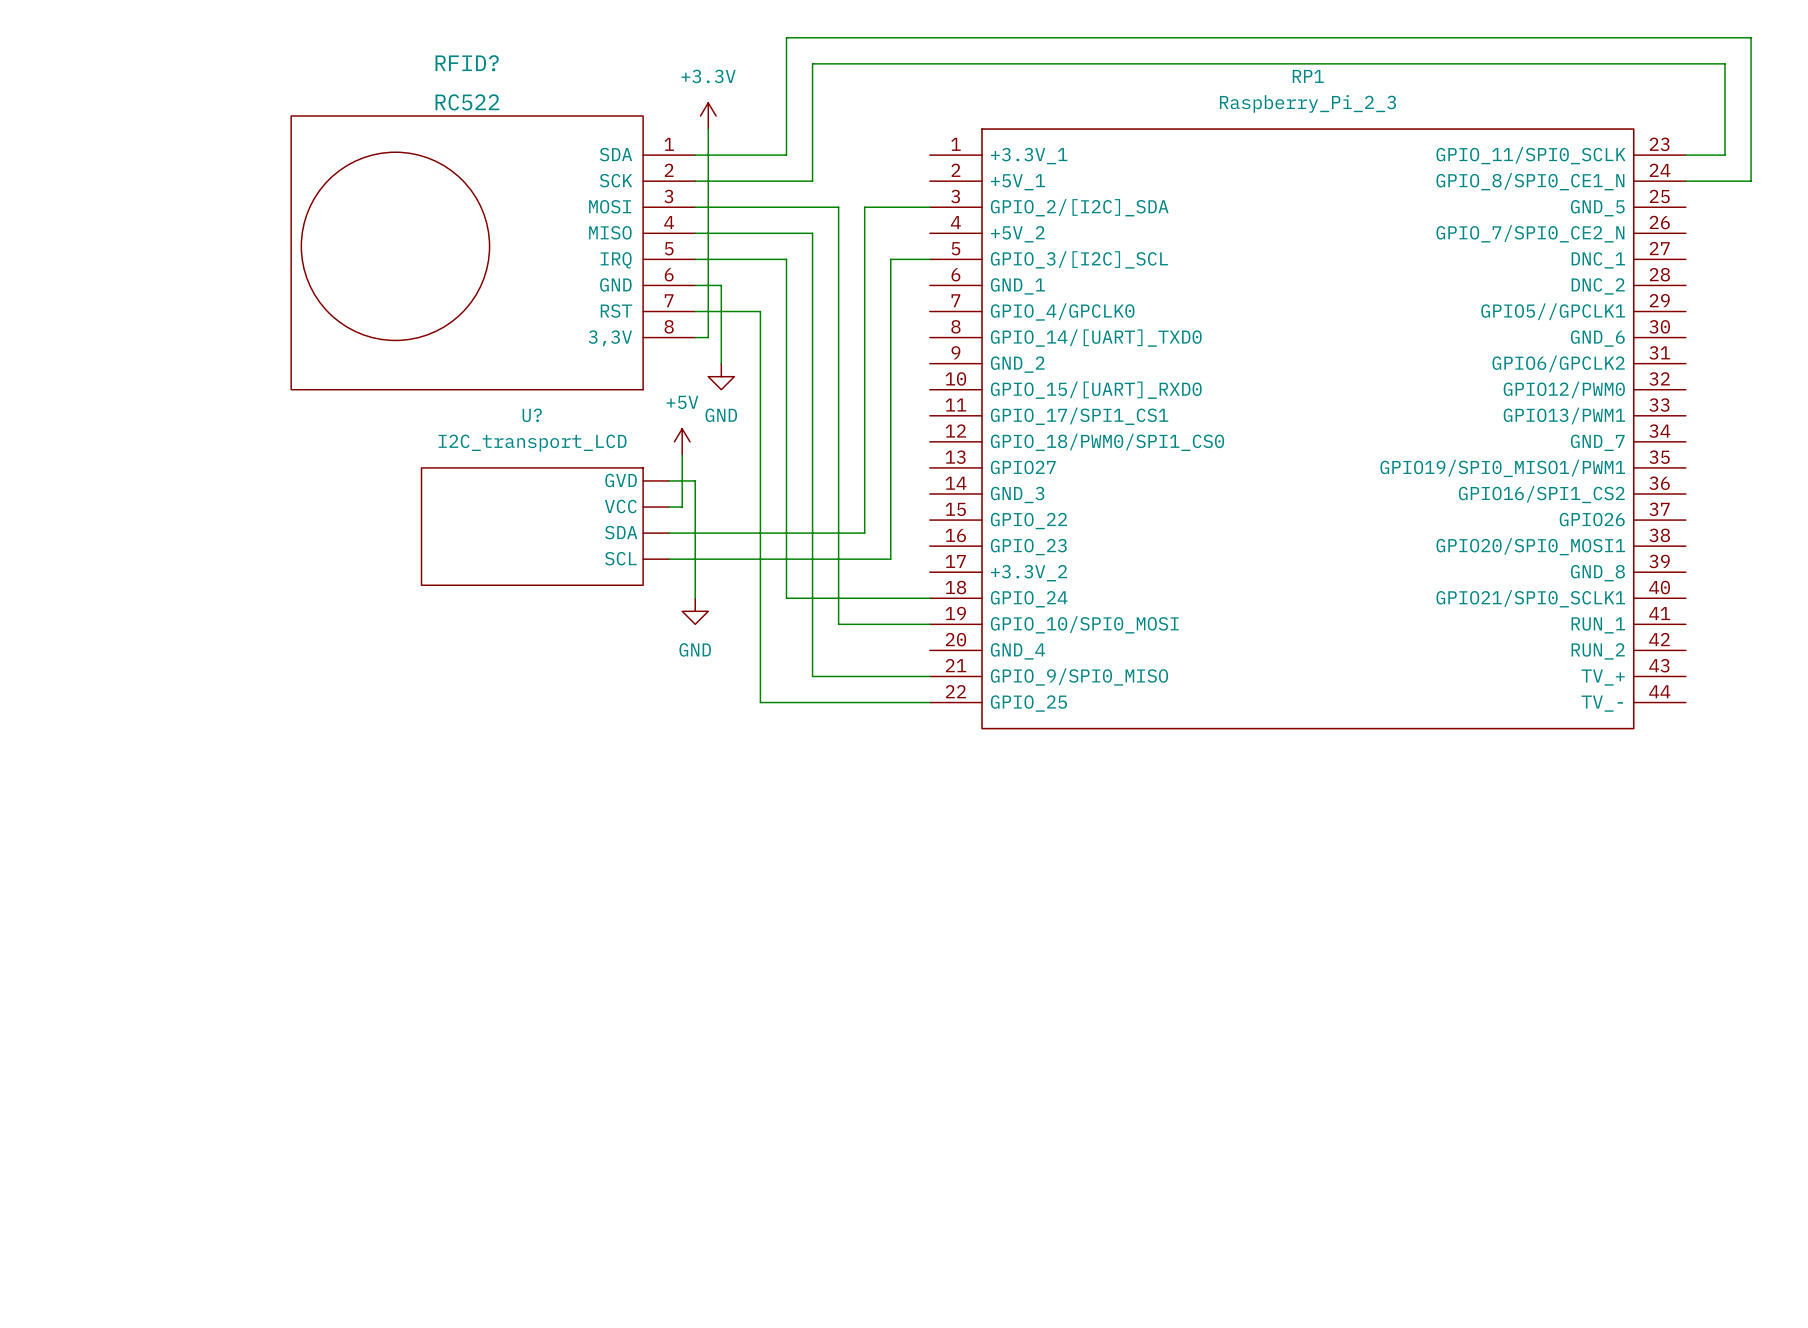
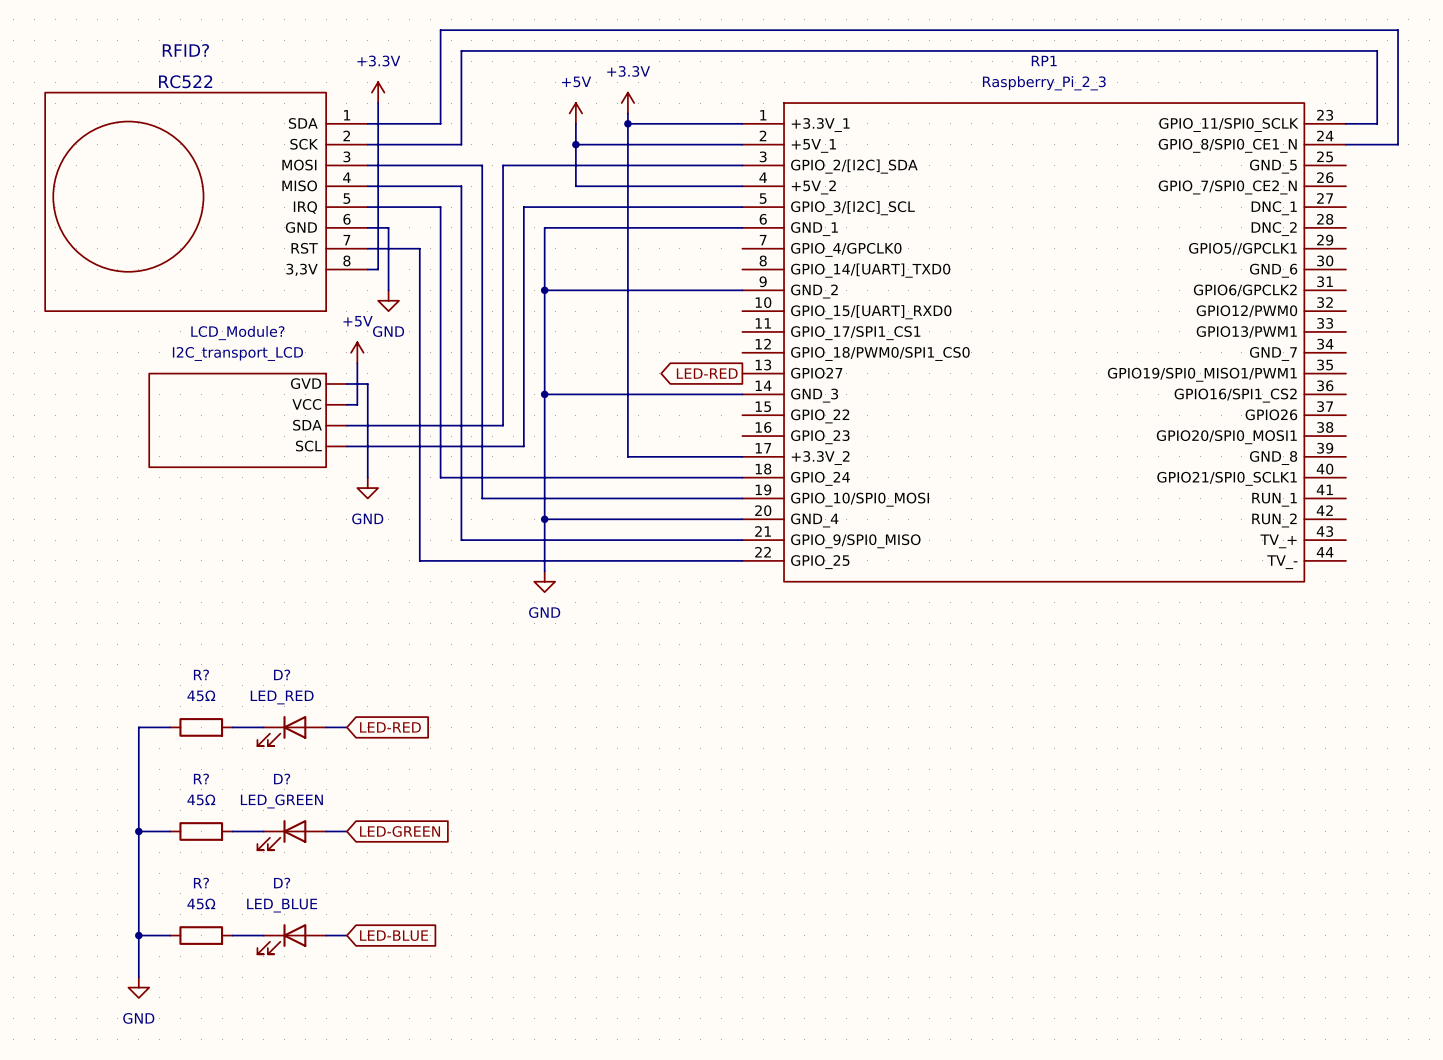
wire: (786, 37) (786, 142) -> (627, 30) (440, 30) (440, 123) (367, 123)
wire: (812, 63) (812, 181) -> (742, 144) (648, 144)
wire: none -> (648, 50) (461, 50) (461, 144) (367, 144)
power symbol: none -> +3.3V (378, 92)
power symbol position: +3.3V (708, 115) -> +3.3V (627, 103)
wire: (708, 129) (708, 337) (695, 337) -> (378, 103) (378, 269) (367, 269)
power symbol: none -> +5V (575, 113)
wire: (695, 155) (786, 155) -> none
junction: none -> (627, 123)
wire: (695, 181) (721, 181) -> none
junction: none -> (575, 144)
wire: none -> (555, 165) (503, 165) (503, 425) (346, 425)
wire: (838, 207) (838, 624) -> (367, 165) (482, 165) (482, 498) (669, 498)
wire: (864, 207) (864, 533) (669, 533) -> (690, 165) (669, 165)
wire: (695, 233) (721, 233) -> (575, 123) (575, 186)
wire: (812, 233) (812, 676) -> (367, 186) (461, 186) (461, 540) (648, 540)
wire: none -> (648, 186) (742, 186)
RFID? position: (493, 252) -> (206, 201)
wire: none -> (367, 207) (440, 207) (440, 477) (627, 477)
wire: none -> (555, 207) (523, 207) (523, 446) (346, 446)
wire: (890, 259) (890, 559) (669, 559) -> (711, 207) (627, 207) (627, 123) (742, 123)
wire: none -> (367, 227) (388, 227) (388, 290)
wire: none -> (555, 227) (544, 227) (544, 363)
wire: (721, 285) (721, 363) -> (575, 227) (742, 227)
wire: (695, 311) (760, 311) (760, 702) -> (367, 248) (419, 248) (419, 560) (607, 560)
wire: none -> (544, 290) (742, 290)
junction: none -> (544, 290)
power symbol: none -> GND (388, 300)
power symbol: GND (721, 376) -> none
power symbol: none -> +5V (357, 352)
power symbol: +5V (682, 441) -> none
wire: none -> (357, 363) (357, 404) (346, 404)
global label: none -> LED-RED (707, 373)
wire: (669, 480) (695, 480) (695, 598) -> (346, 383) (367, 383) (367, 477)
wire: none -> (544, 394) (742, 394)
junction: none -> (544, 394)
wire: (669, 507) (682, 507) -> (544, 571) (544, 404)
LCD_Module?: none -> I2C_transport_LCD (248, 420)
U?: I2C_transport_LCD (545, 526) -> none
wire: (786, 572) (786, 598) -> (627, 456) (742, 456)
power symbol: none -> GND (367, 488)
power symbol: GND (695, 611) -> none
wire: none -> (544, 519) (742, 519)
junction: none -> (544, 519)
power symbol: none -> GND (544, 581)
wire: none -> (170, 727) (138, 727) (138, 977)
R?: none -> 45Ω (201, 727)
wire: none -> (232, 727) (263, 727)
wire: none -> (326, 727) (346, 727)
global label: none -> LED-RED (390, 727)
D?: none -> LED_RED (291, 731)
wire: none -> (138, 831) (170, 831)
junction: none -> (138, 831)
R?: none -> 45Ω (201, 831)
wire: none -> (232, 831) (263, 831)
wire: none -> (326, 831) (346, 831)
global label: none -> LED-GREEN (400, 831)
D?: none -> LED_GREEN (291, 835)
wire: none -> (138, 935) (170, 935)
junction: none -> (138, 935)
R?: none -> 45Ω (201, 935)
wire: none -> (232, 935) (263, 935)
wire: none -> (326, 935) (346, 935)
global label: none -> LED-BLUE (394, 935)
D?: none -> LED_BLUE (291, 939)
power symbol: none -> GND (138, 987)

